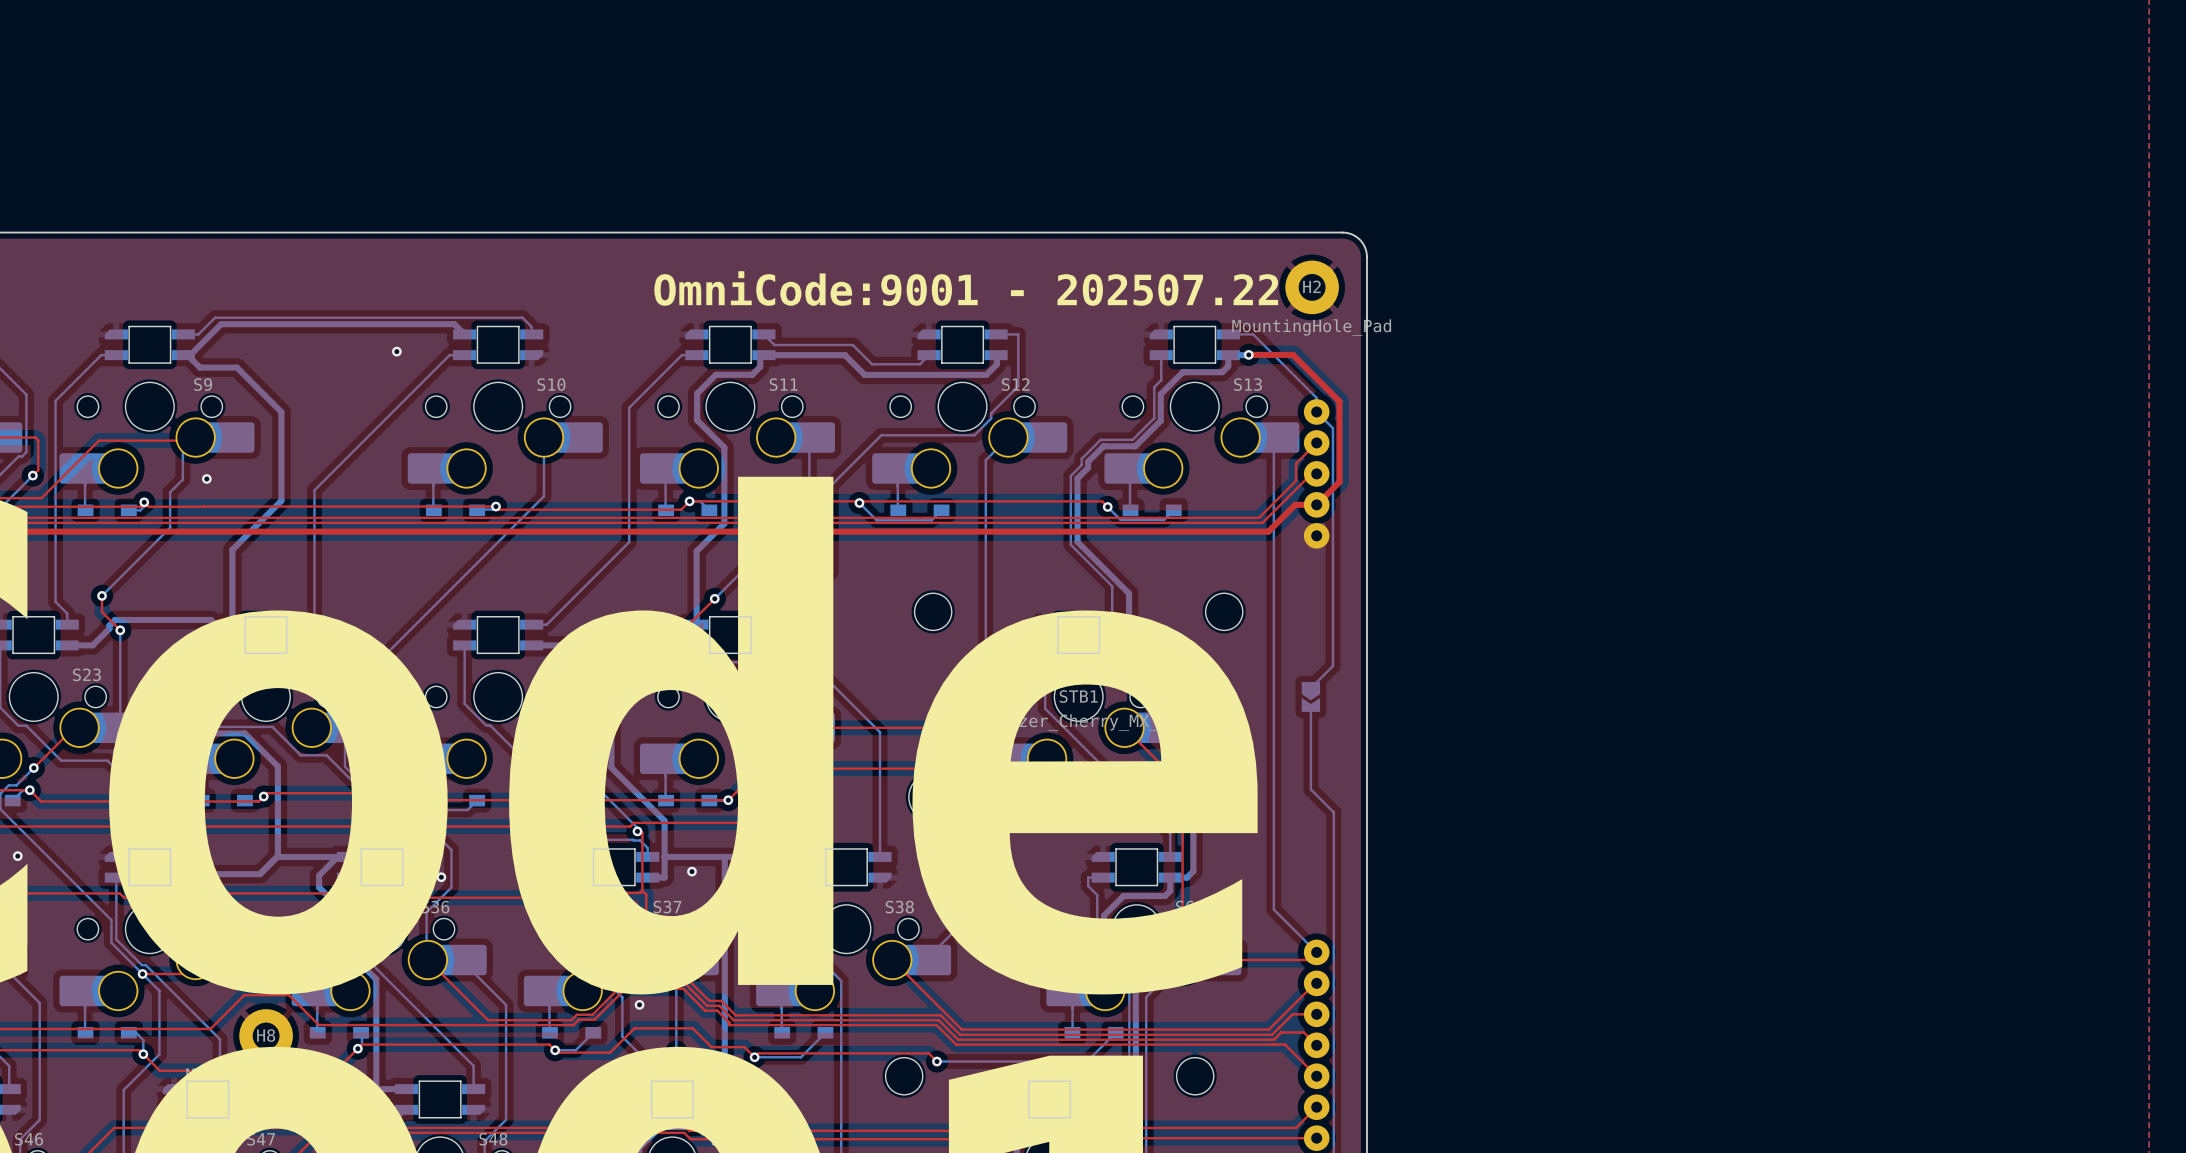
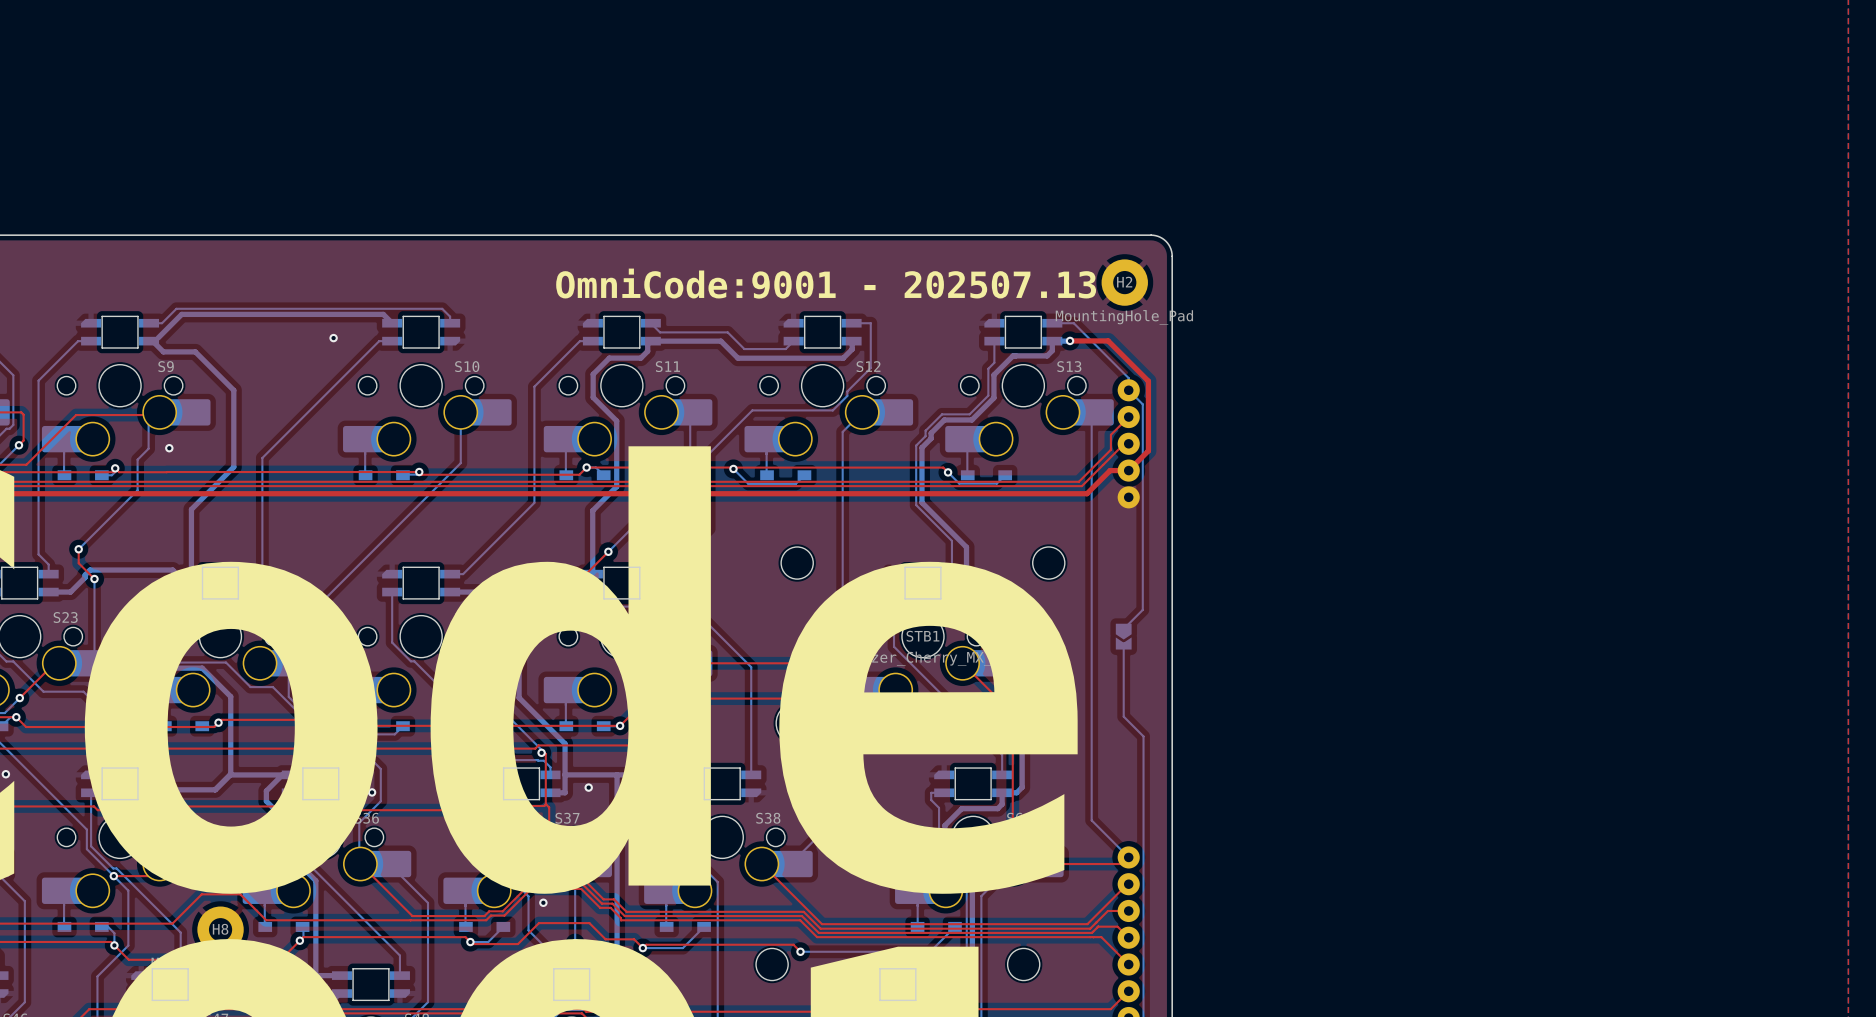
text: OmniCode:9001 - 202507.22 (966, 288) -> OmniCode:9001 - 202507.13 (826, 283)

